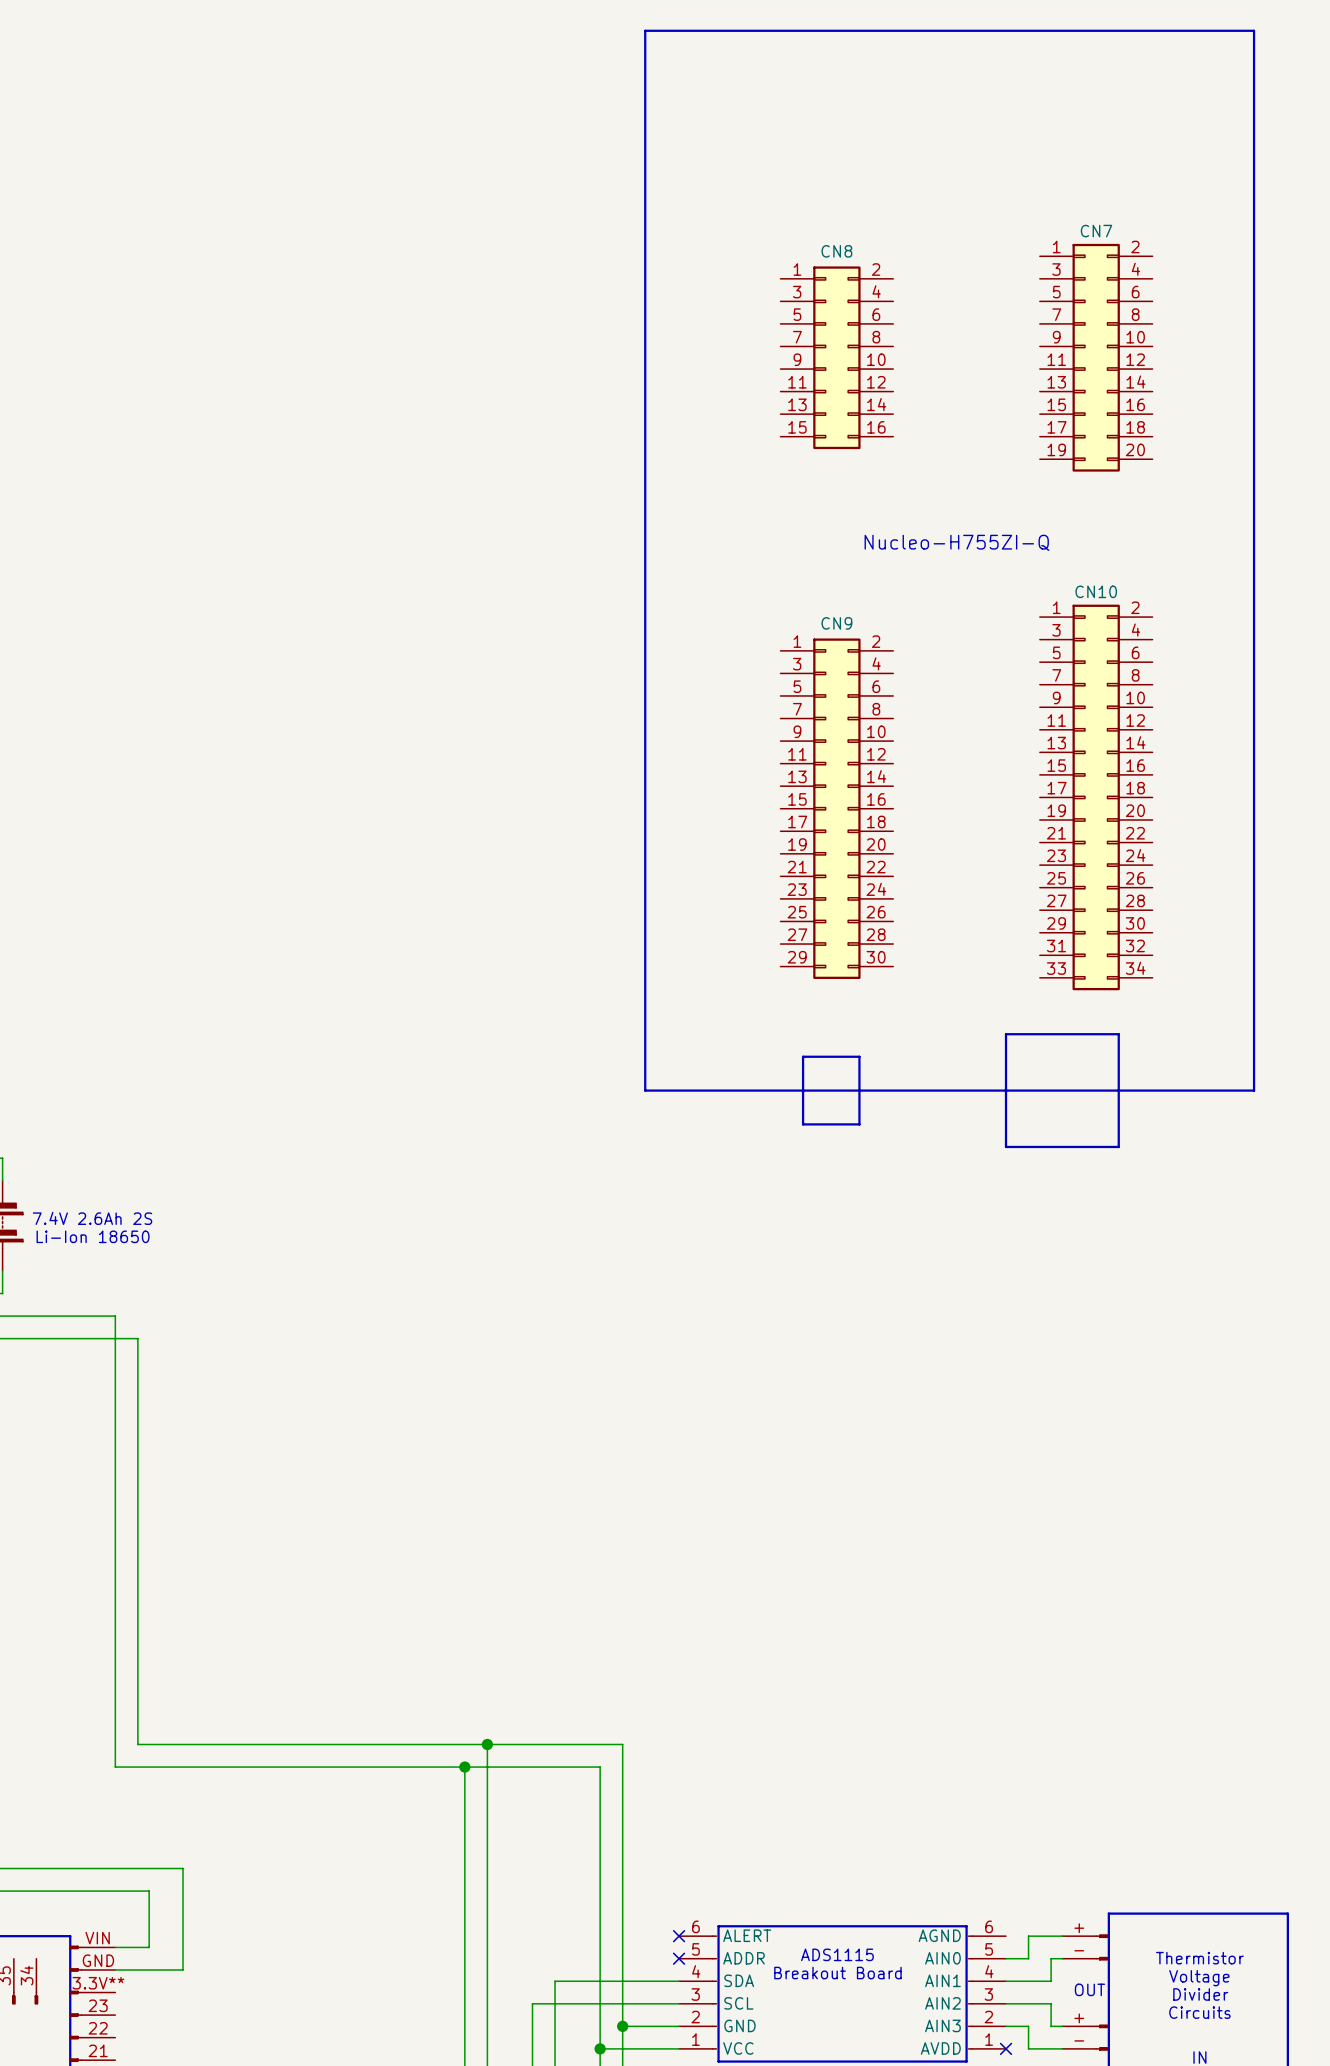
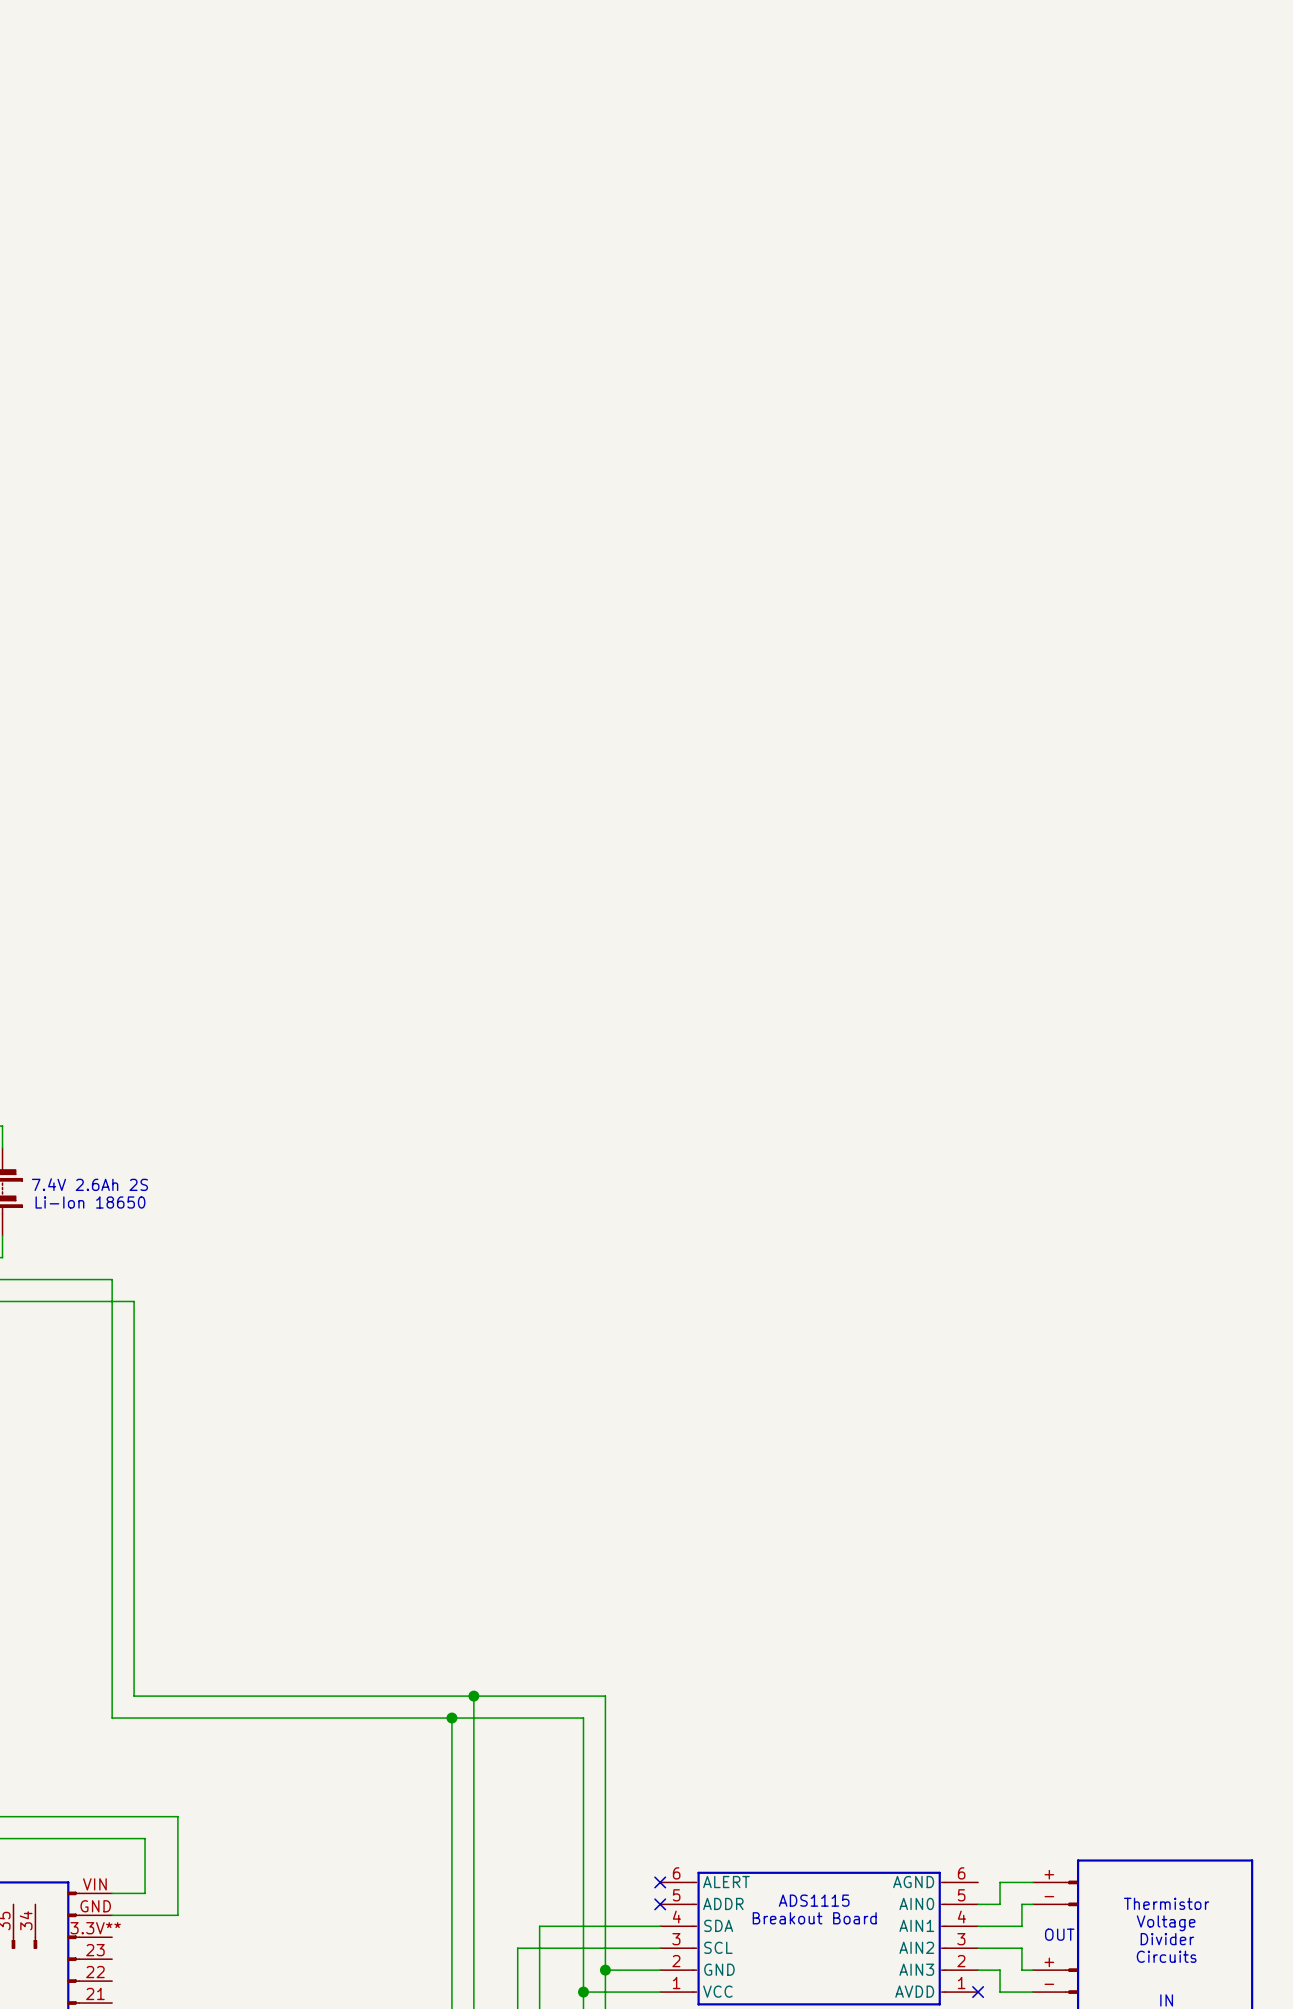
line: (645, 30) (1254, 30) (1254, 1090) (645, 1090) (645, 30) -> none
CN8: (836, 357) -> none
CN7: (1096, 357) -> none
text: Nucleo-H755ZI-Q (957, 542) -> none
CN10: (1096, 797) -> none
CN9: (836, 808) -> none
line: (1006, 1034) (1118, 1034) (1118, 1146) (1006, 1146) (1006, 1034) -> none
line: (803, 1056) (859, 1056) (859, 1124) (803, 1124) (803, 1056) -> none

